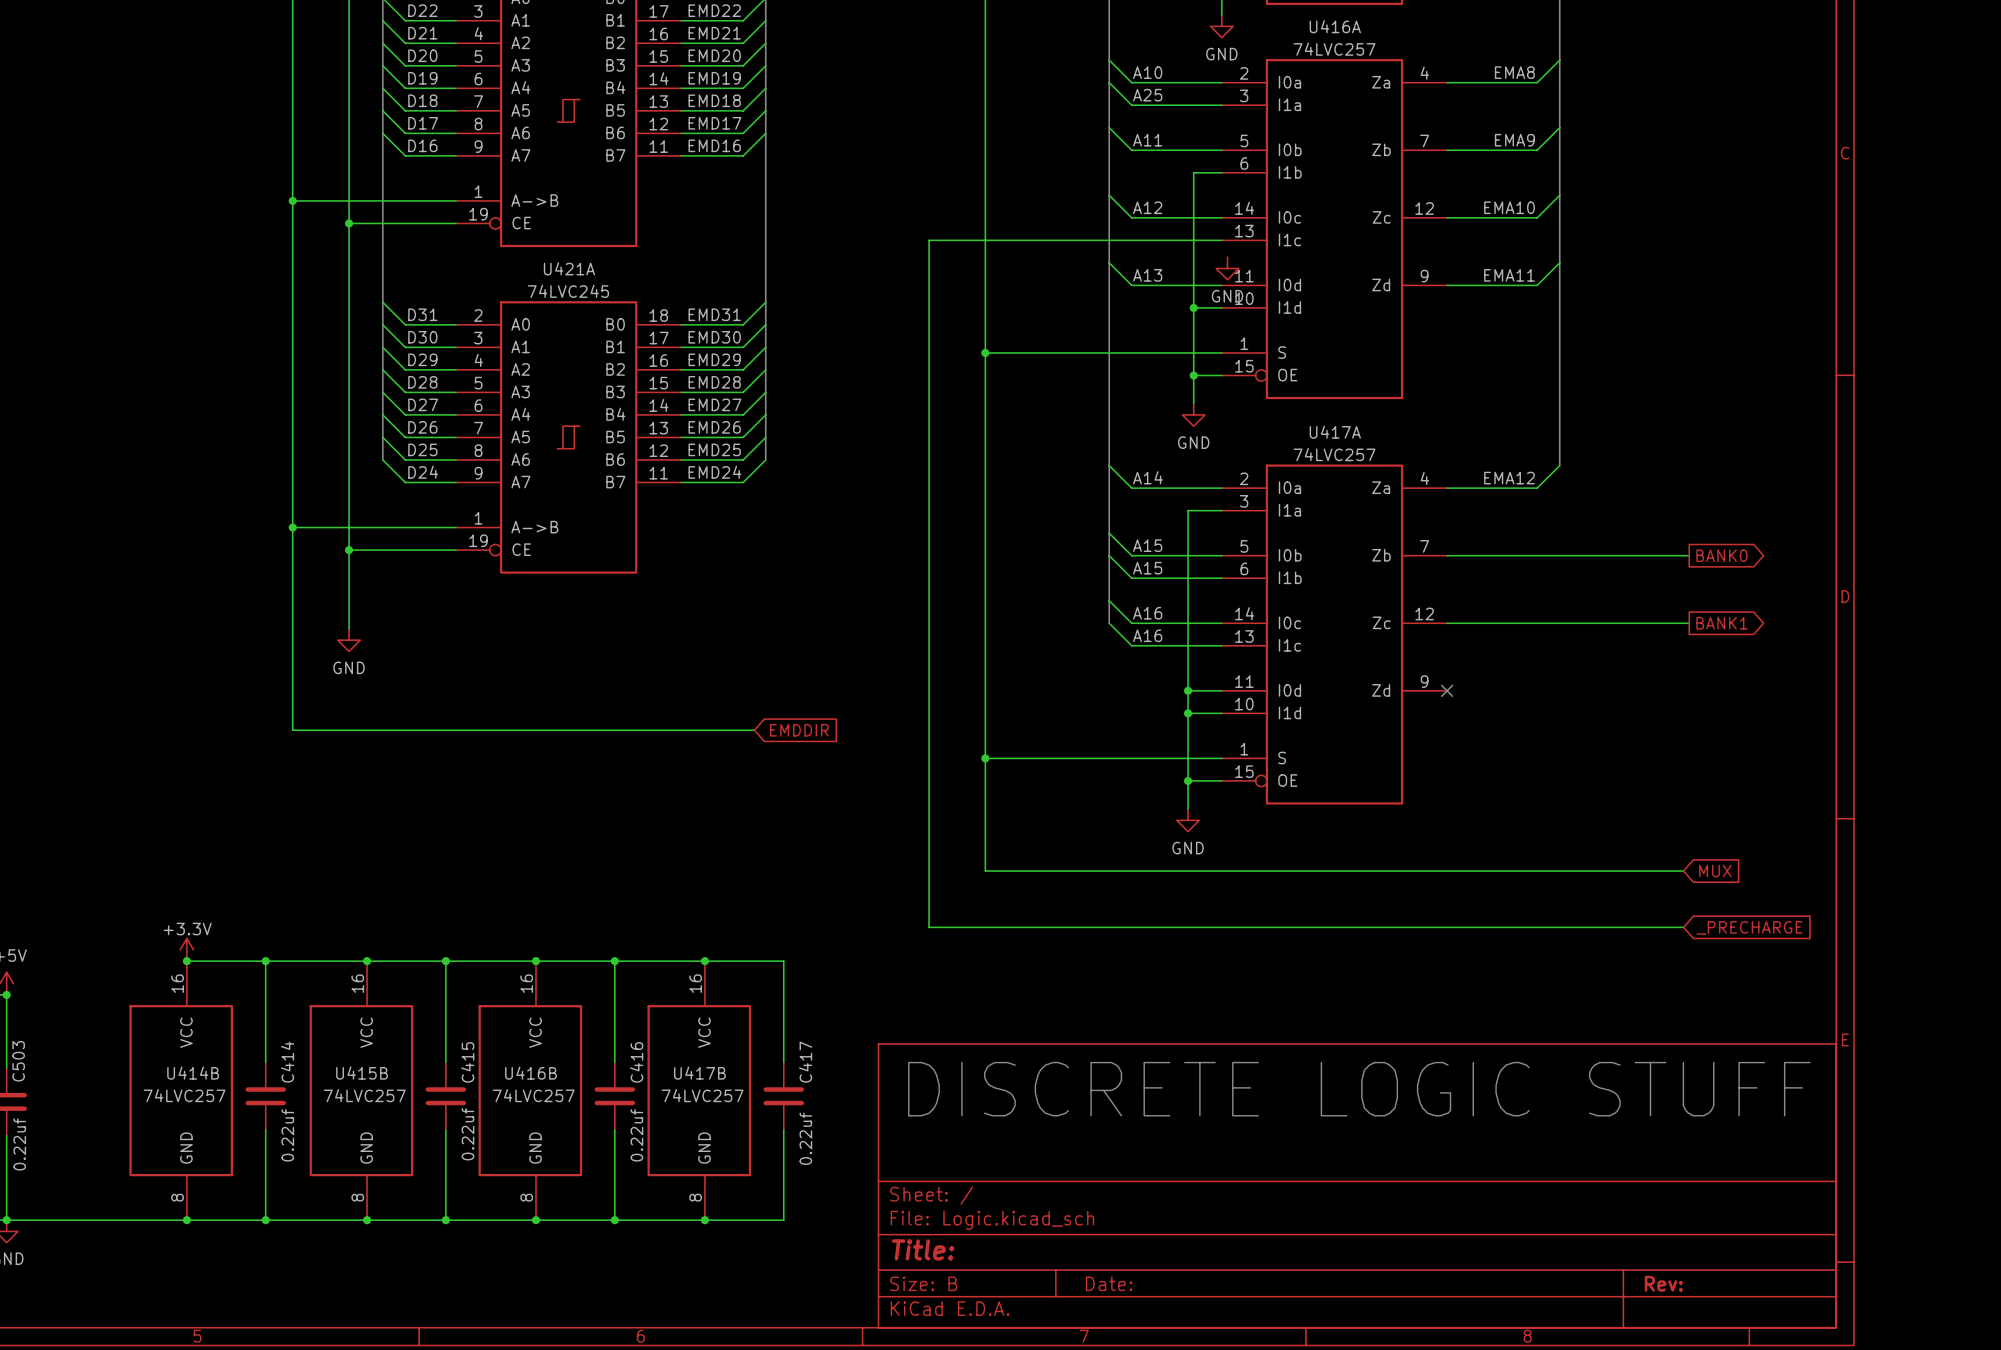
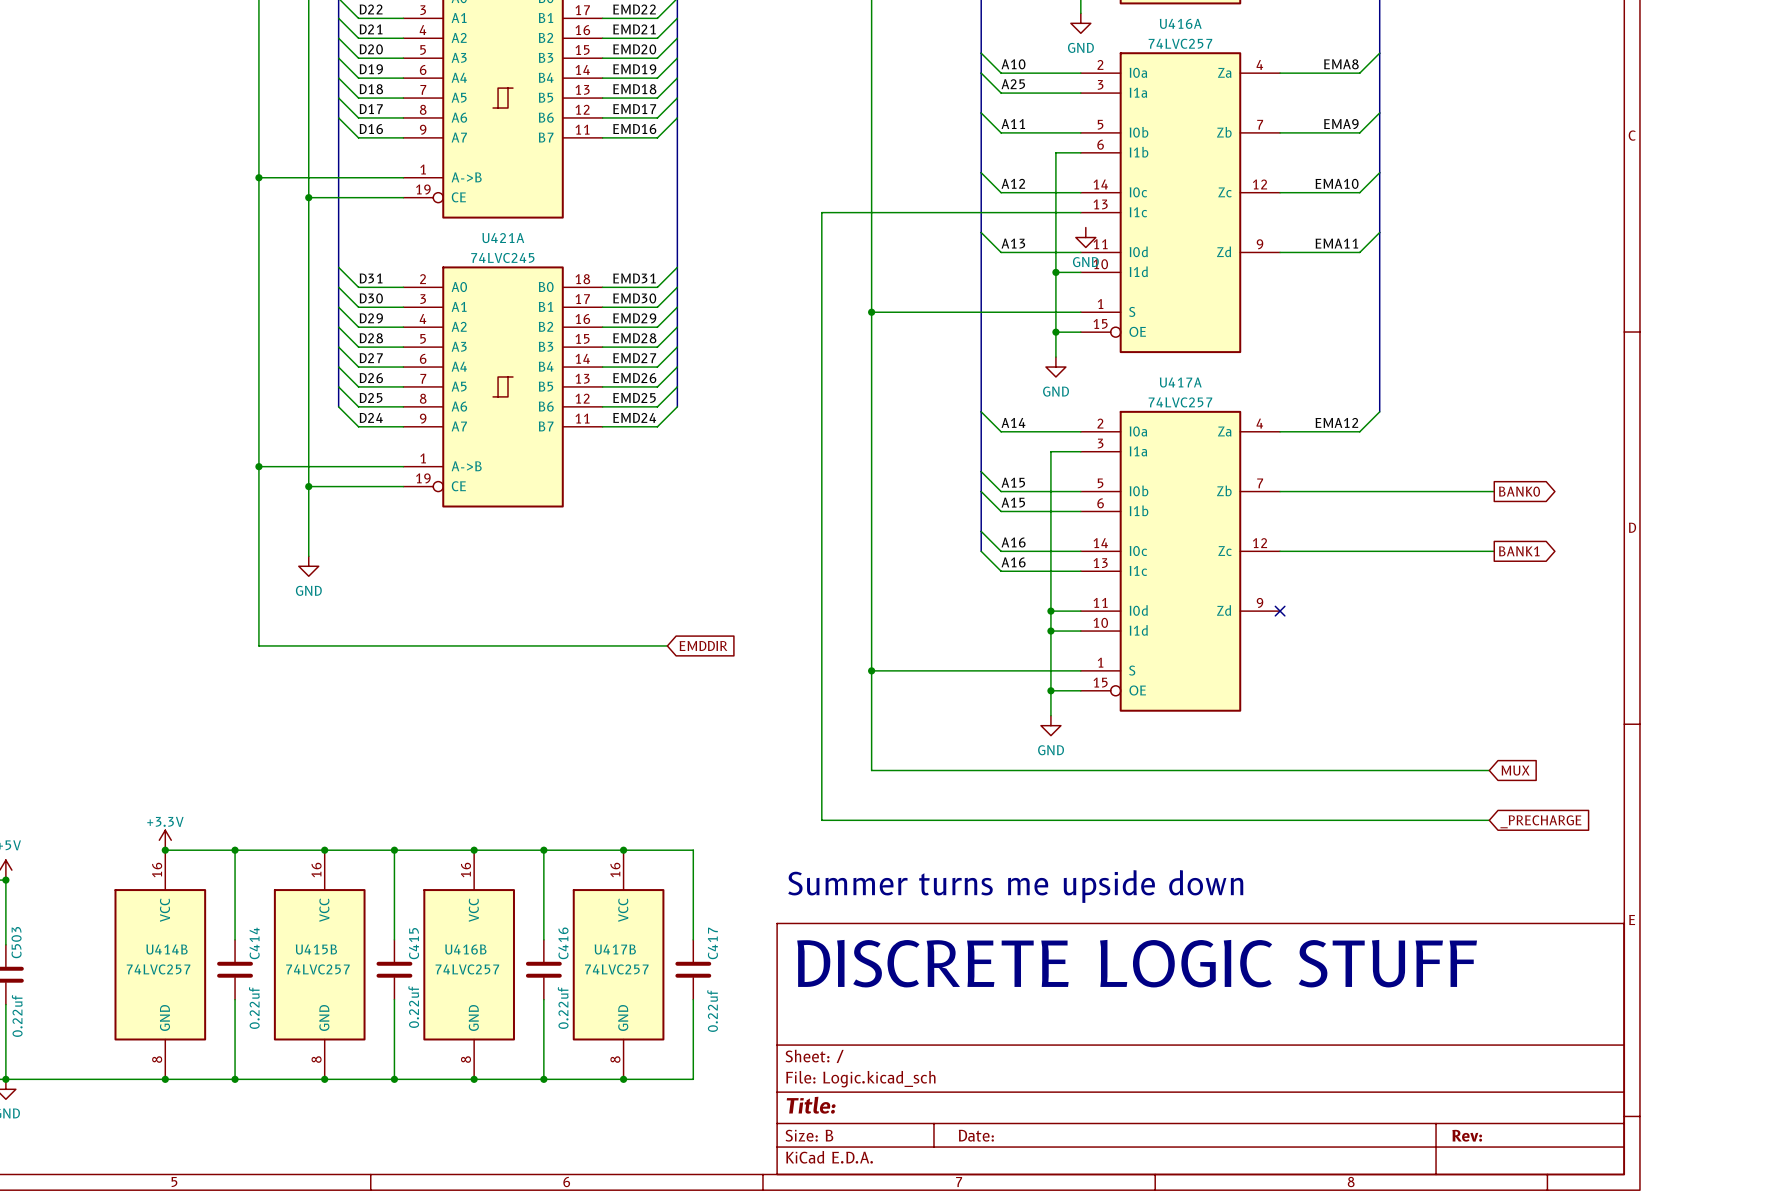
text: none -> Summer turns me upside down (1015, 886)

